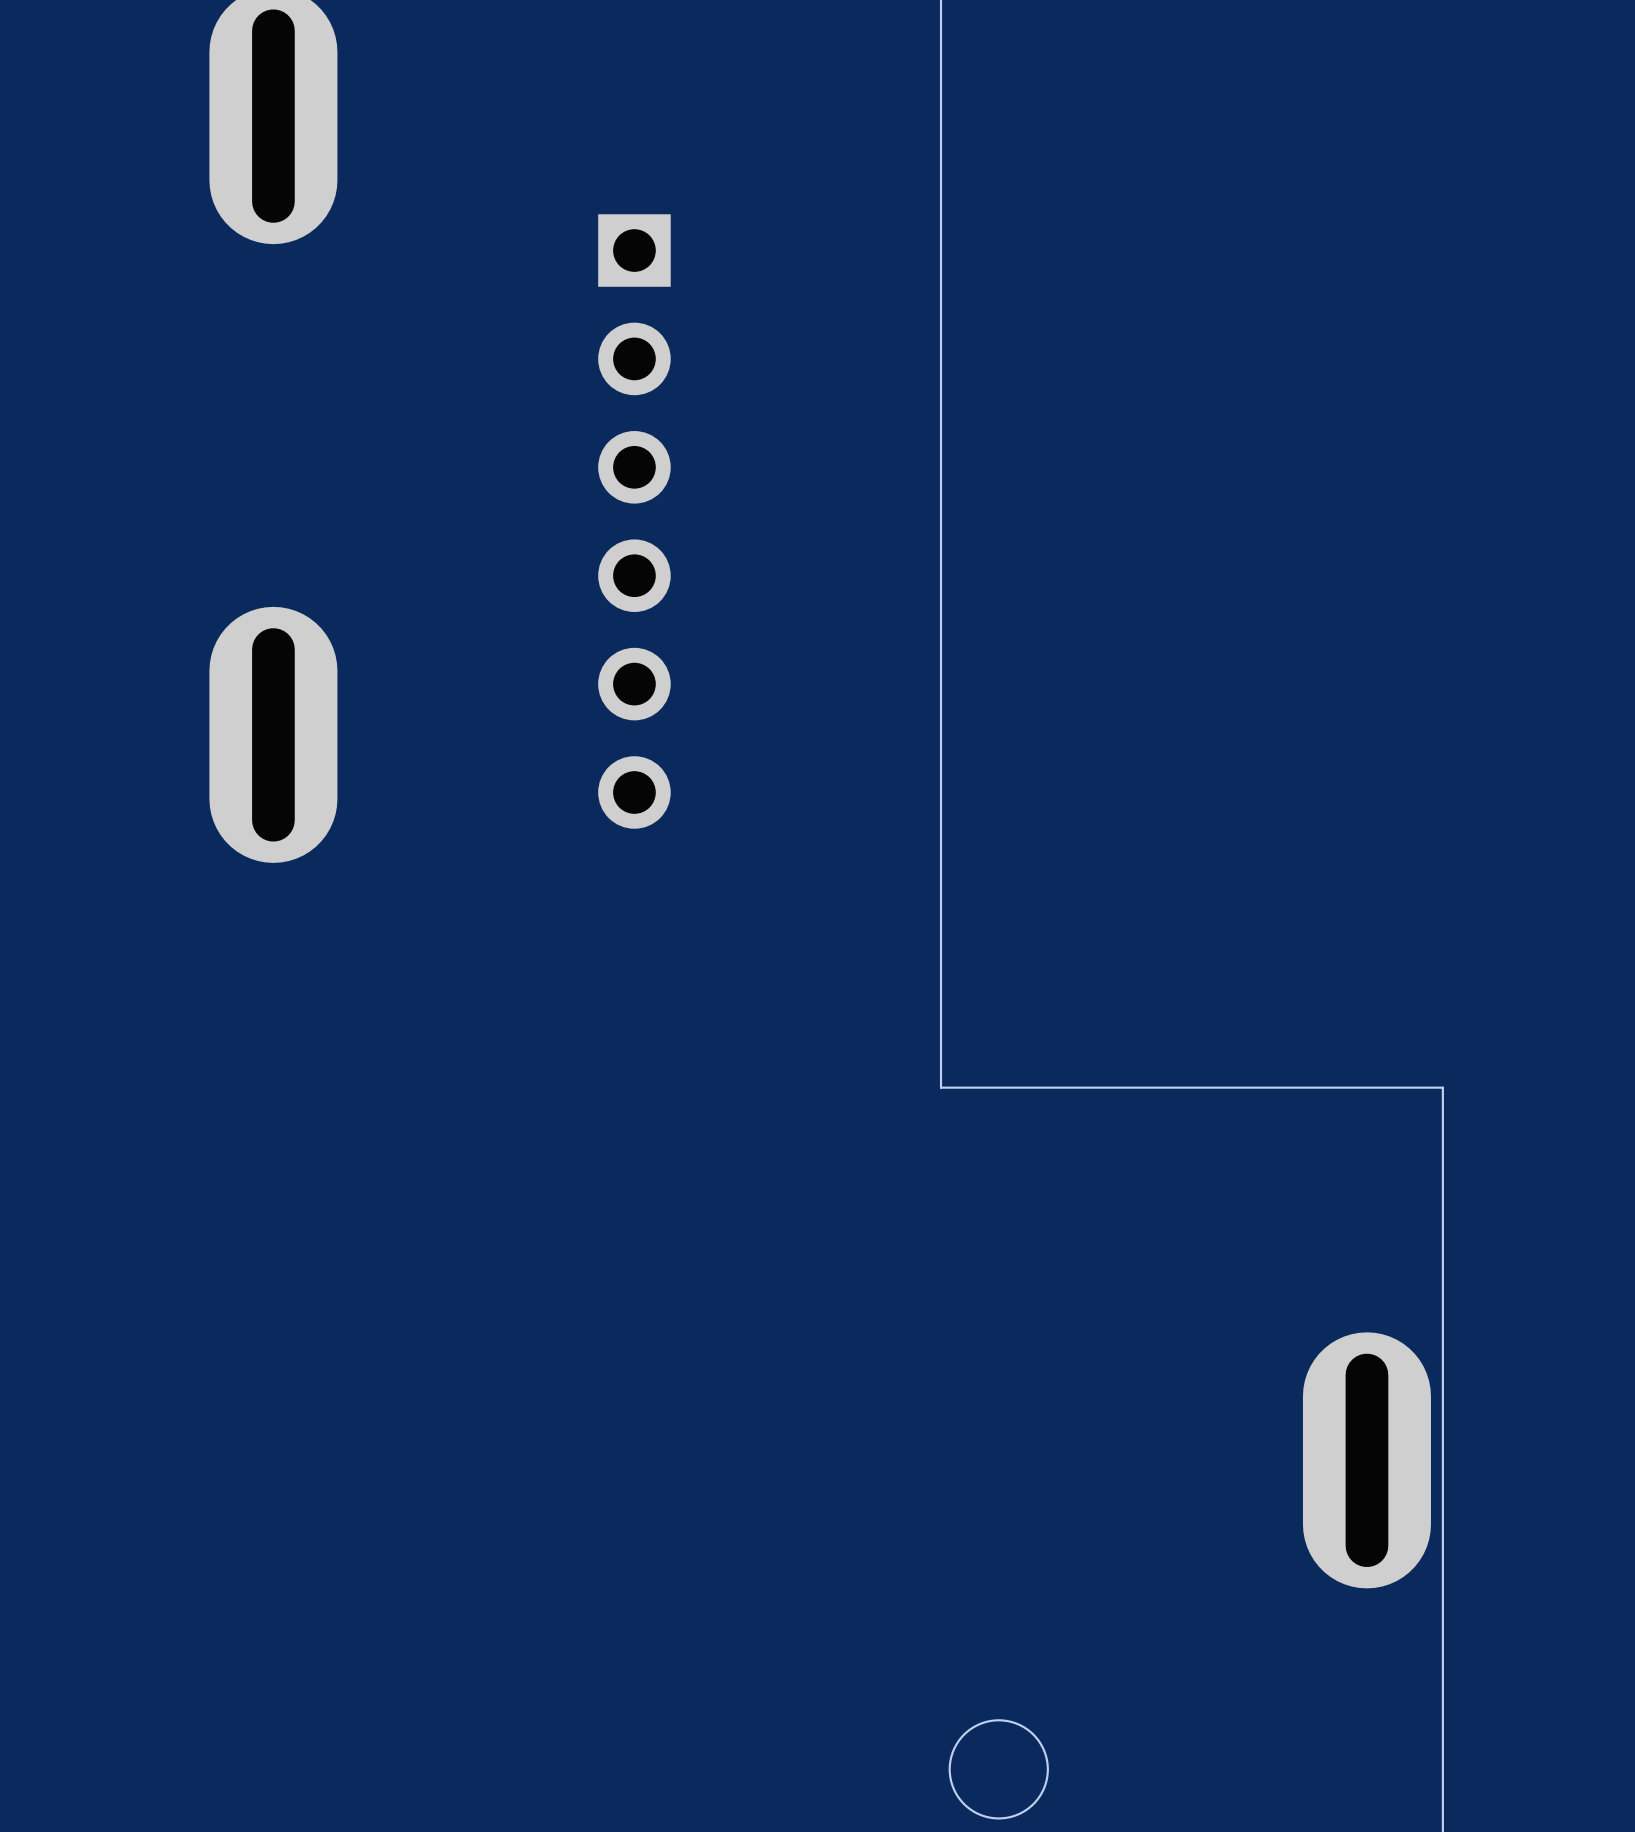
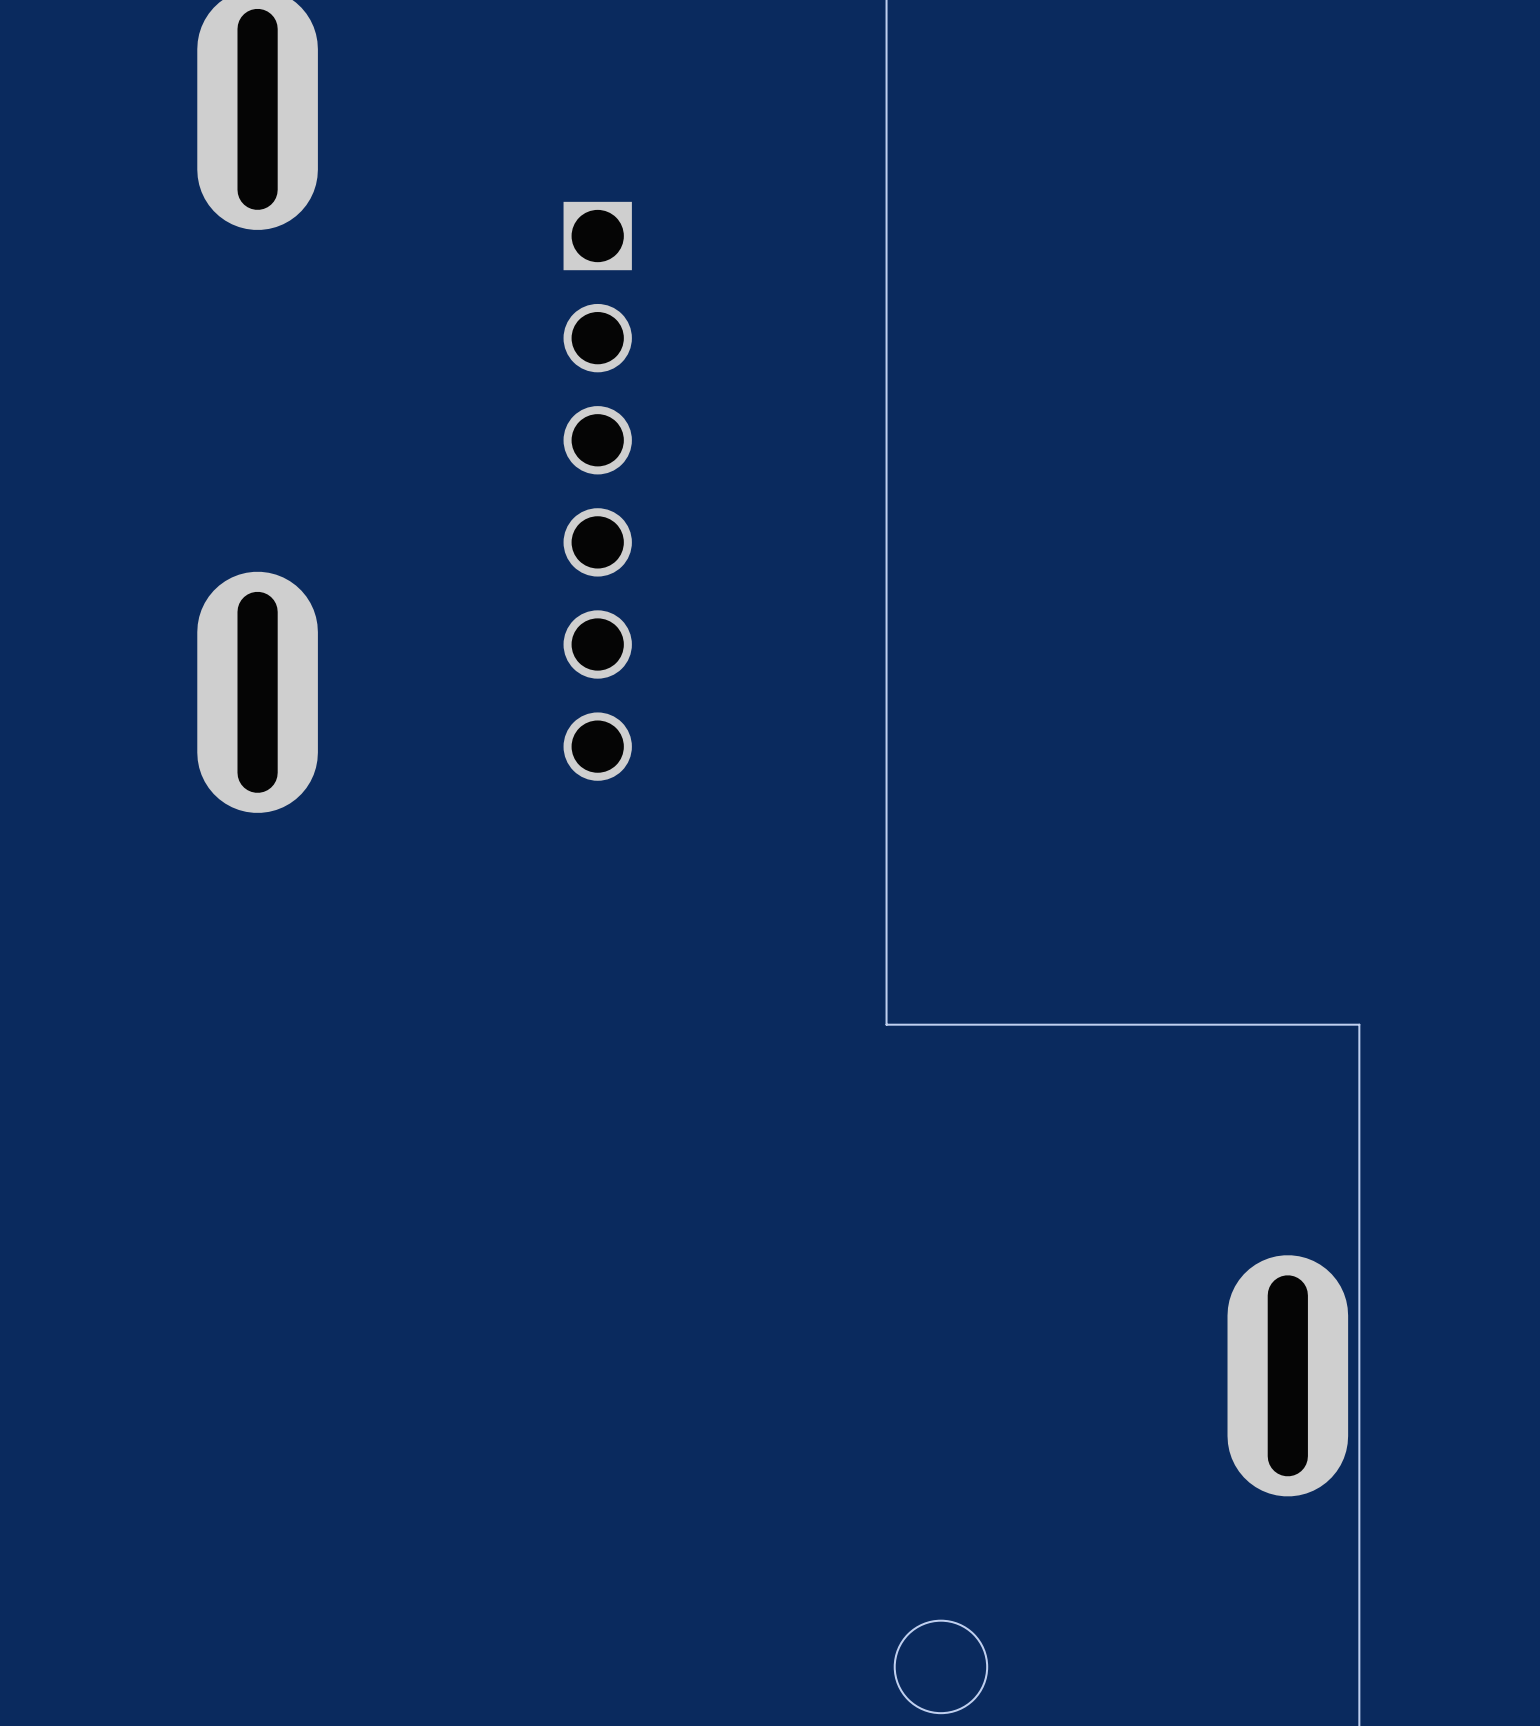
part footprint: [598, 214, 671, 829] -> [563, 201, 632, 781]

